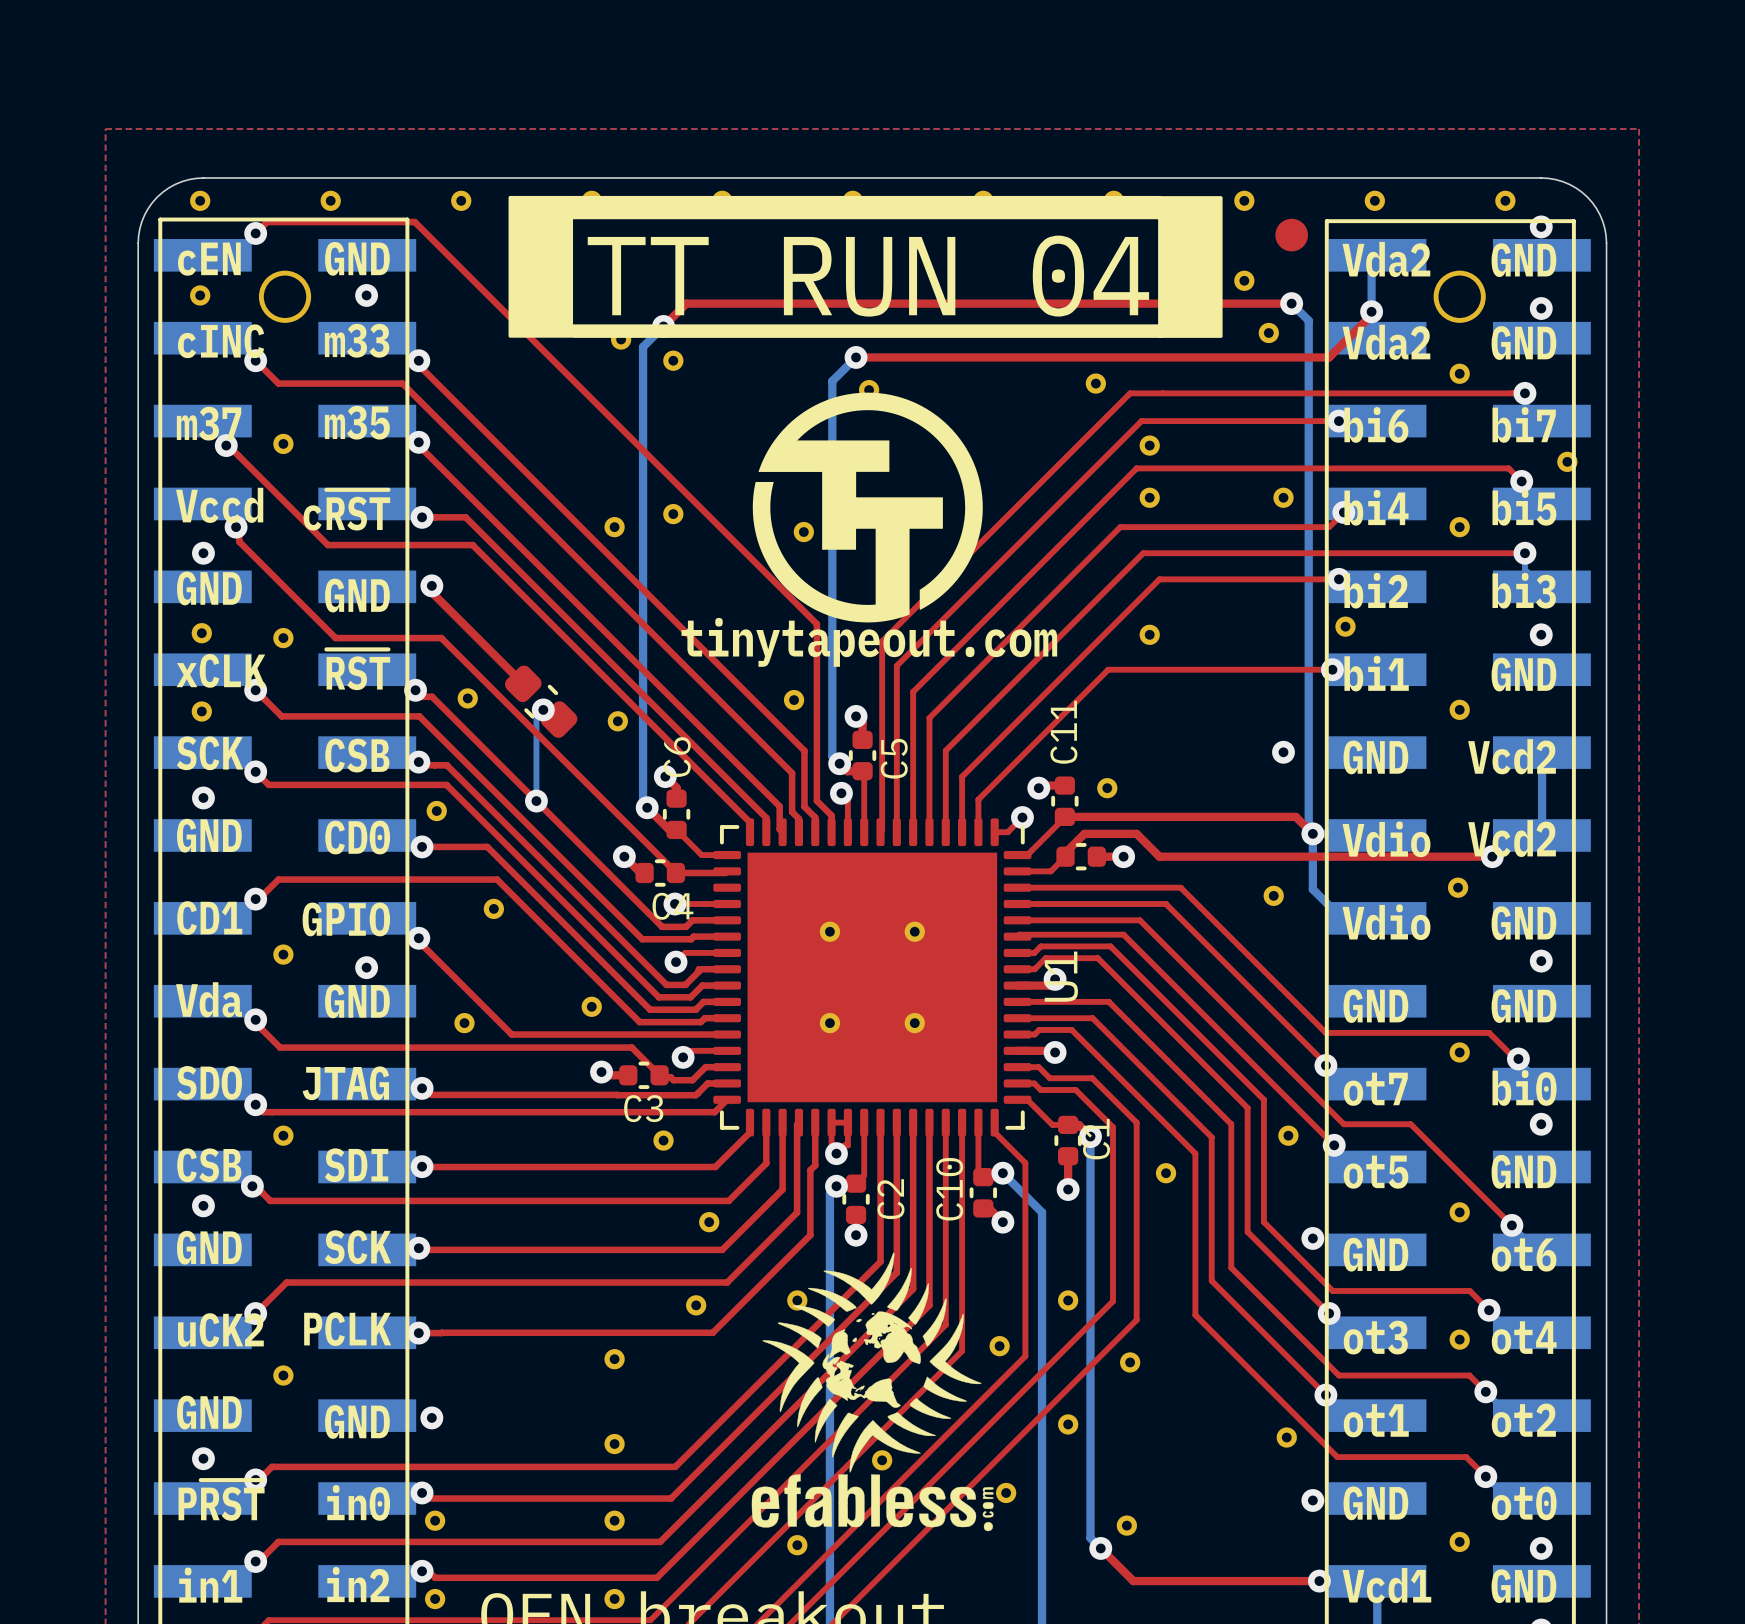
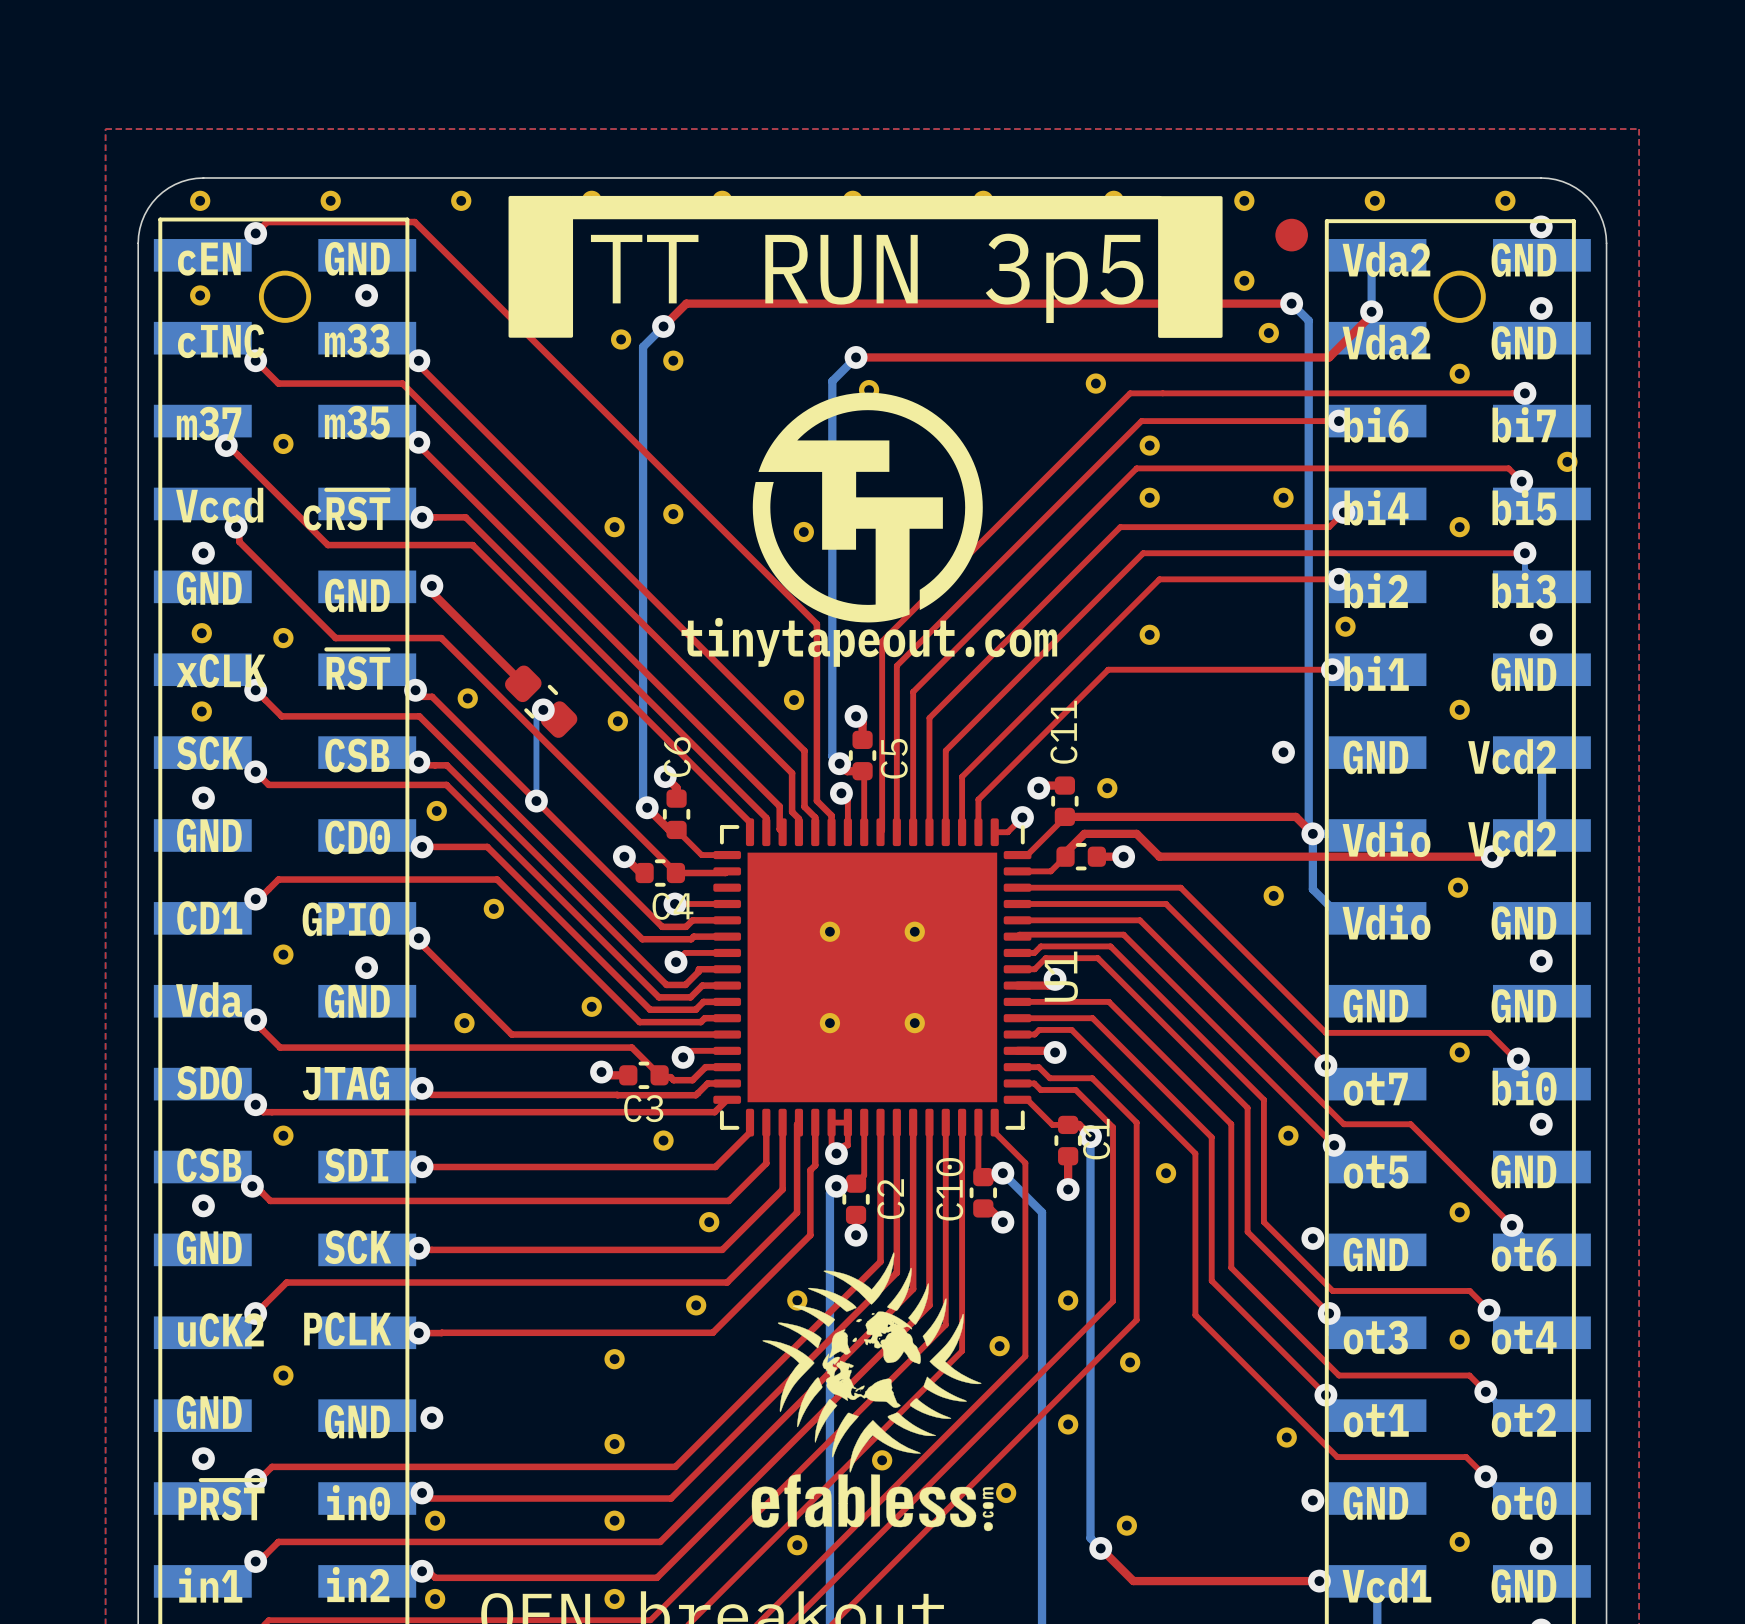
text: TT RUN 04 (868, 276) -> TT RUN 3p5 (867, 278)
drawing: [571, 324, 1164, 338] -> none

